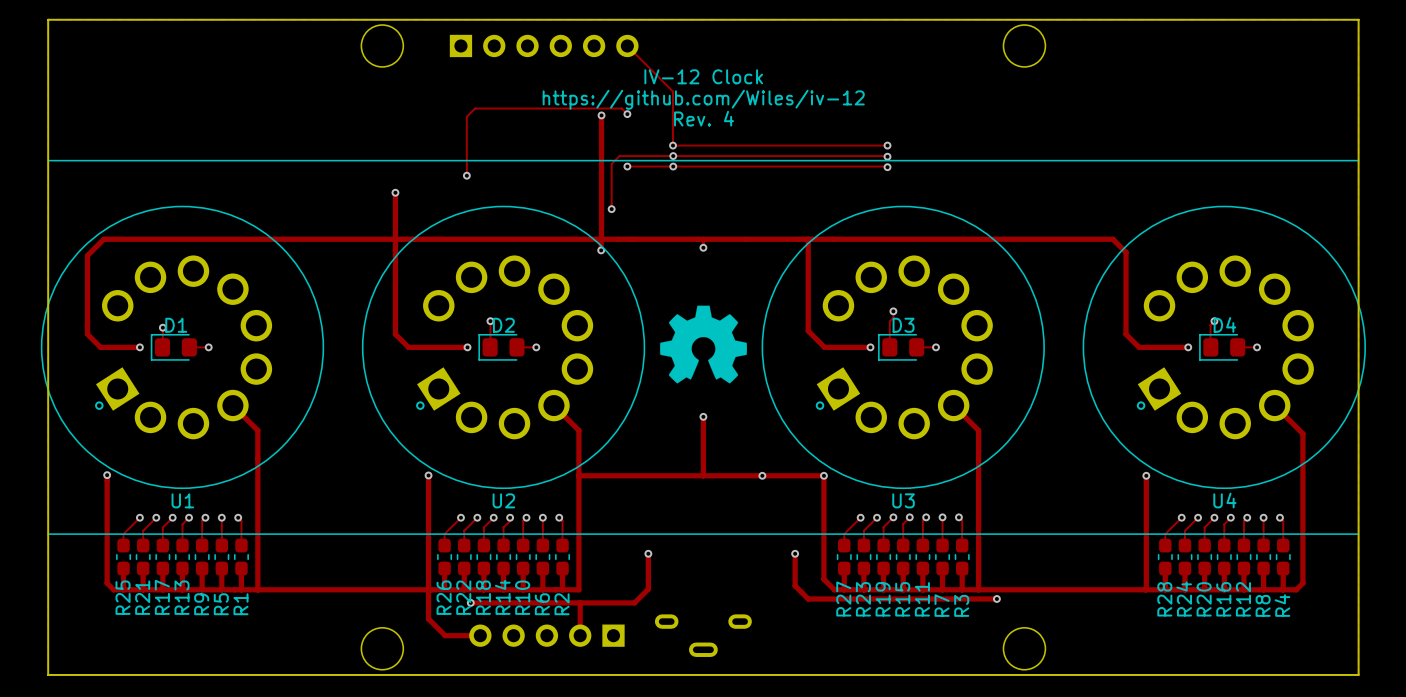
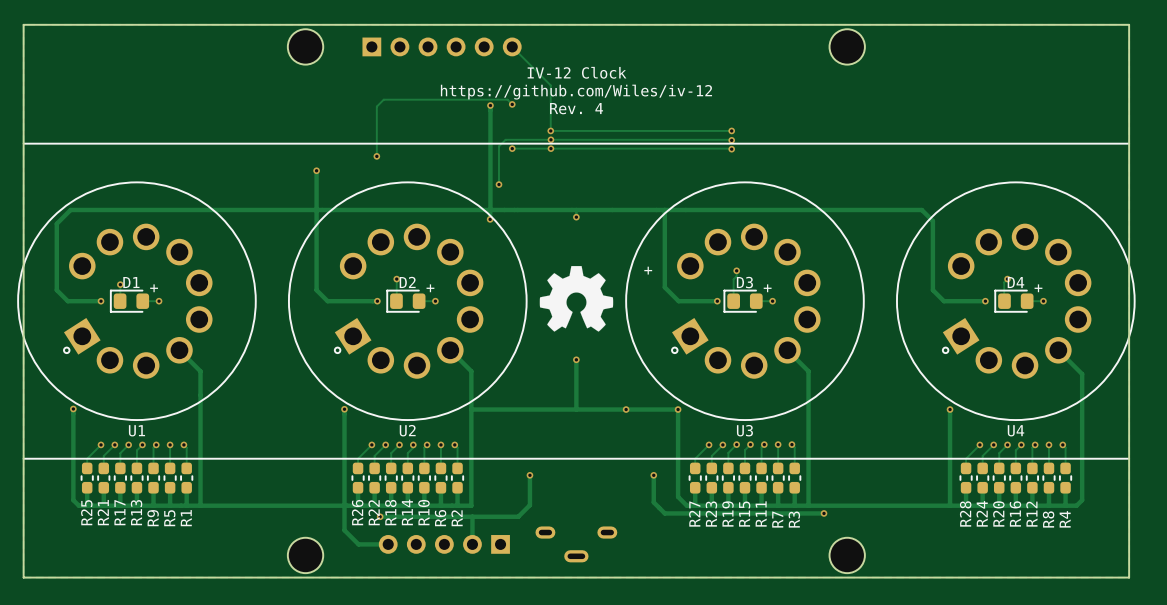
text: none -> + (648, 270)
text: none -> + (154, 288)
text: none -> + (430, 288)
text: none -> + (767, 288)
text: none -> + (1038, 288)

